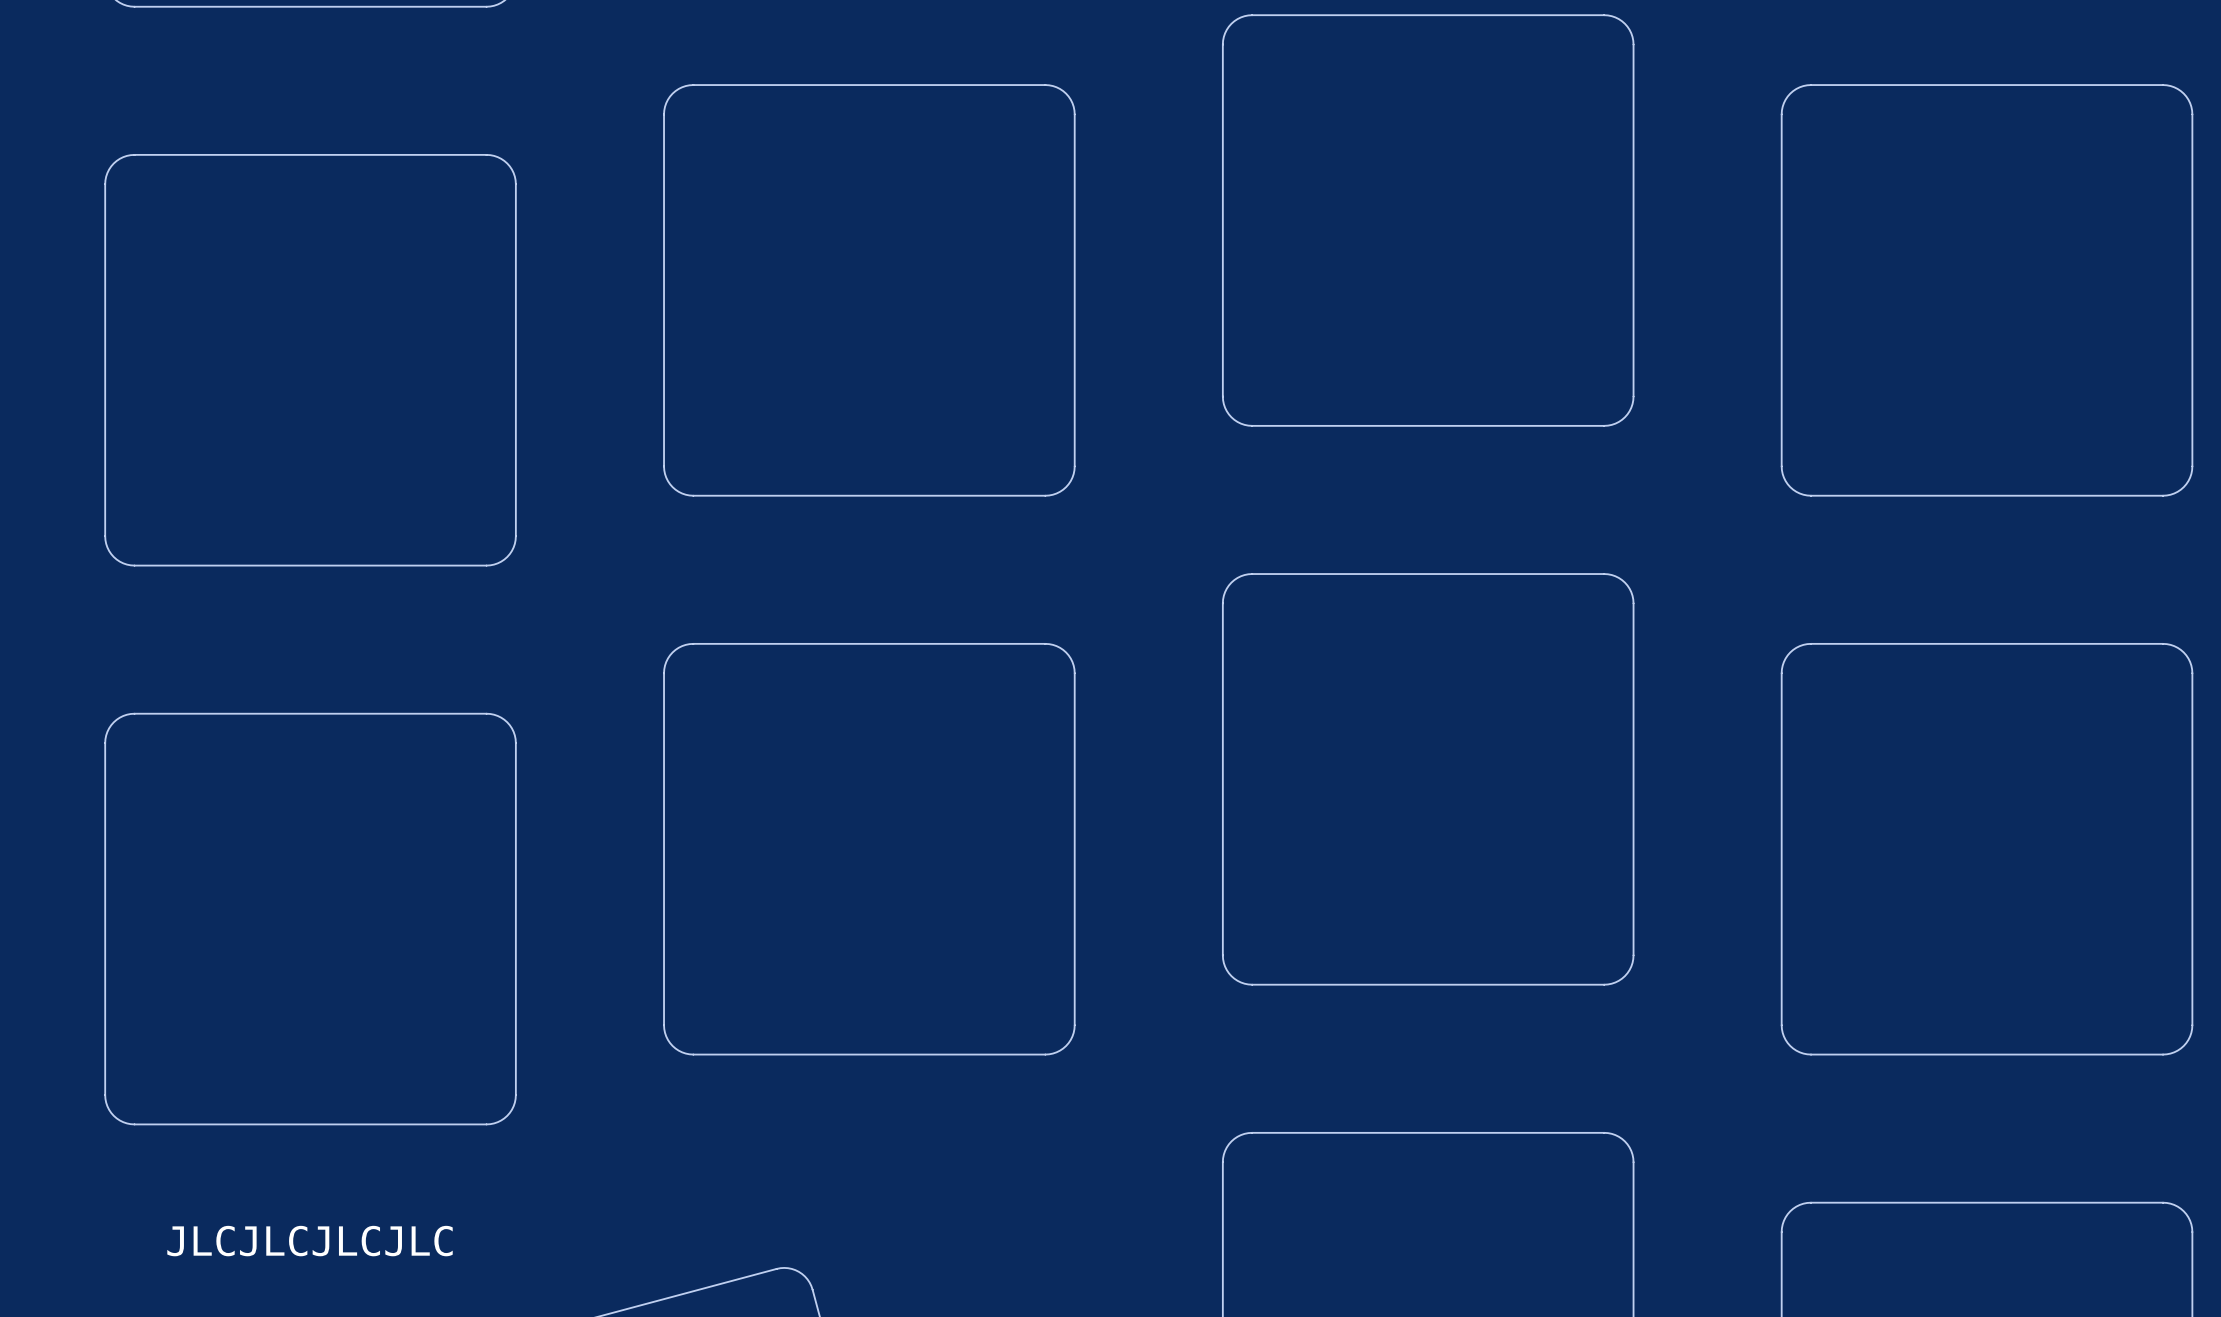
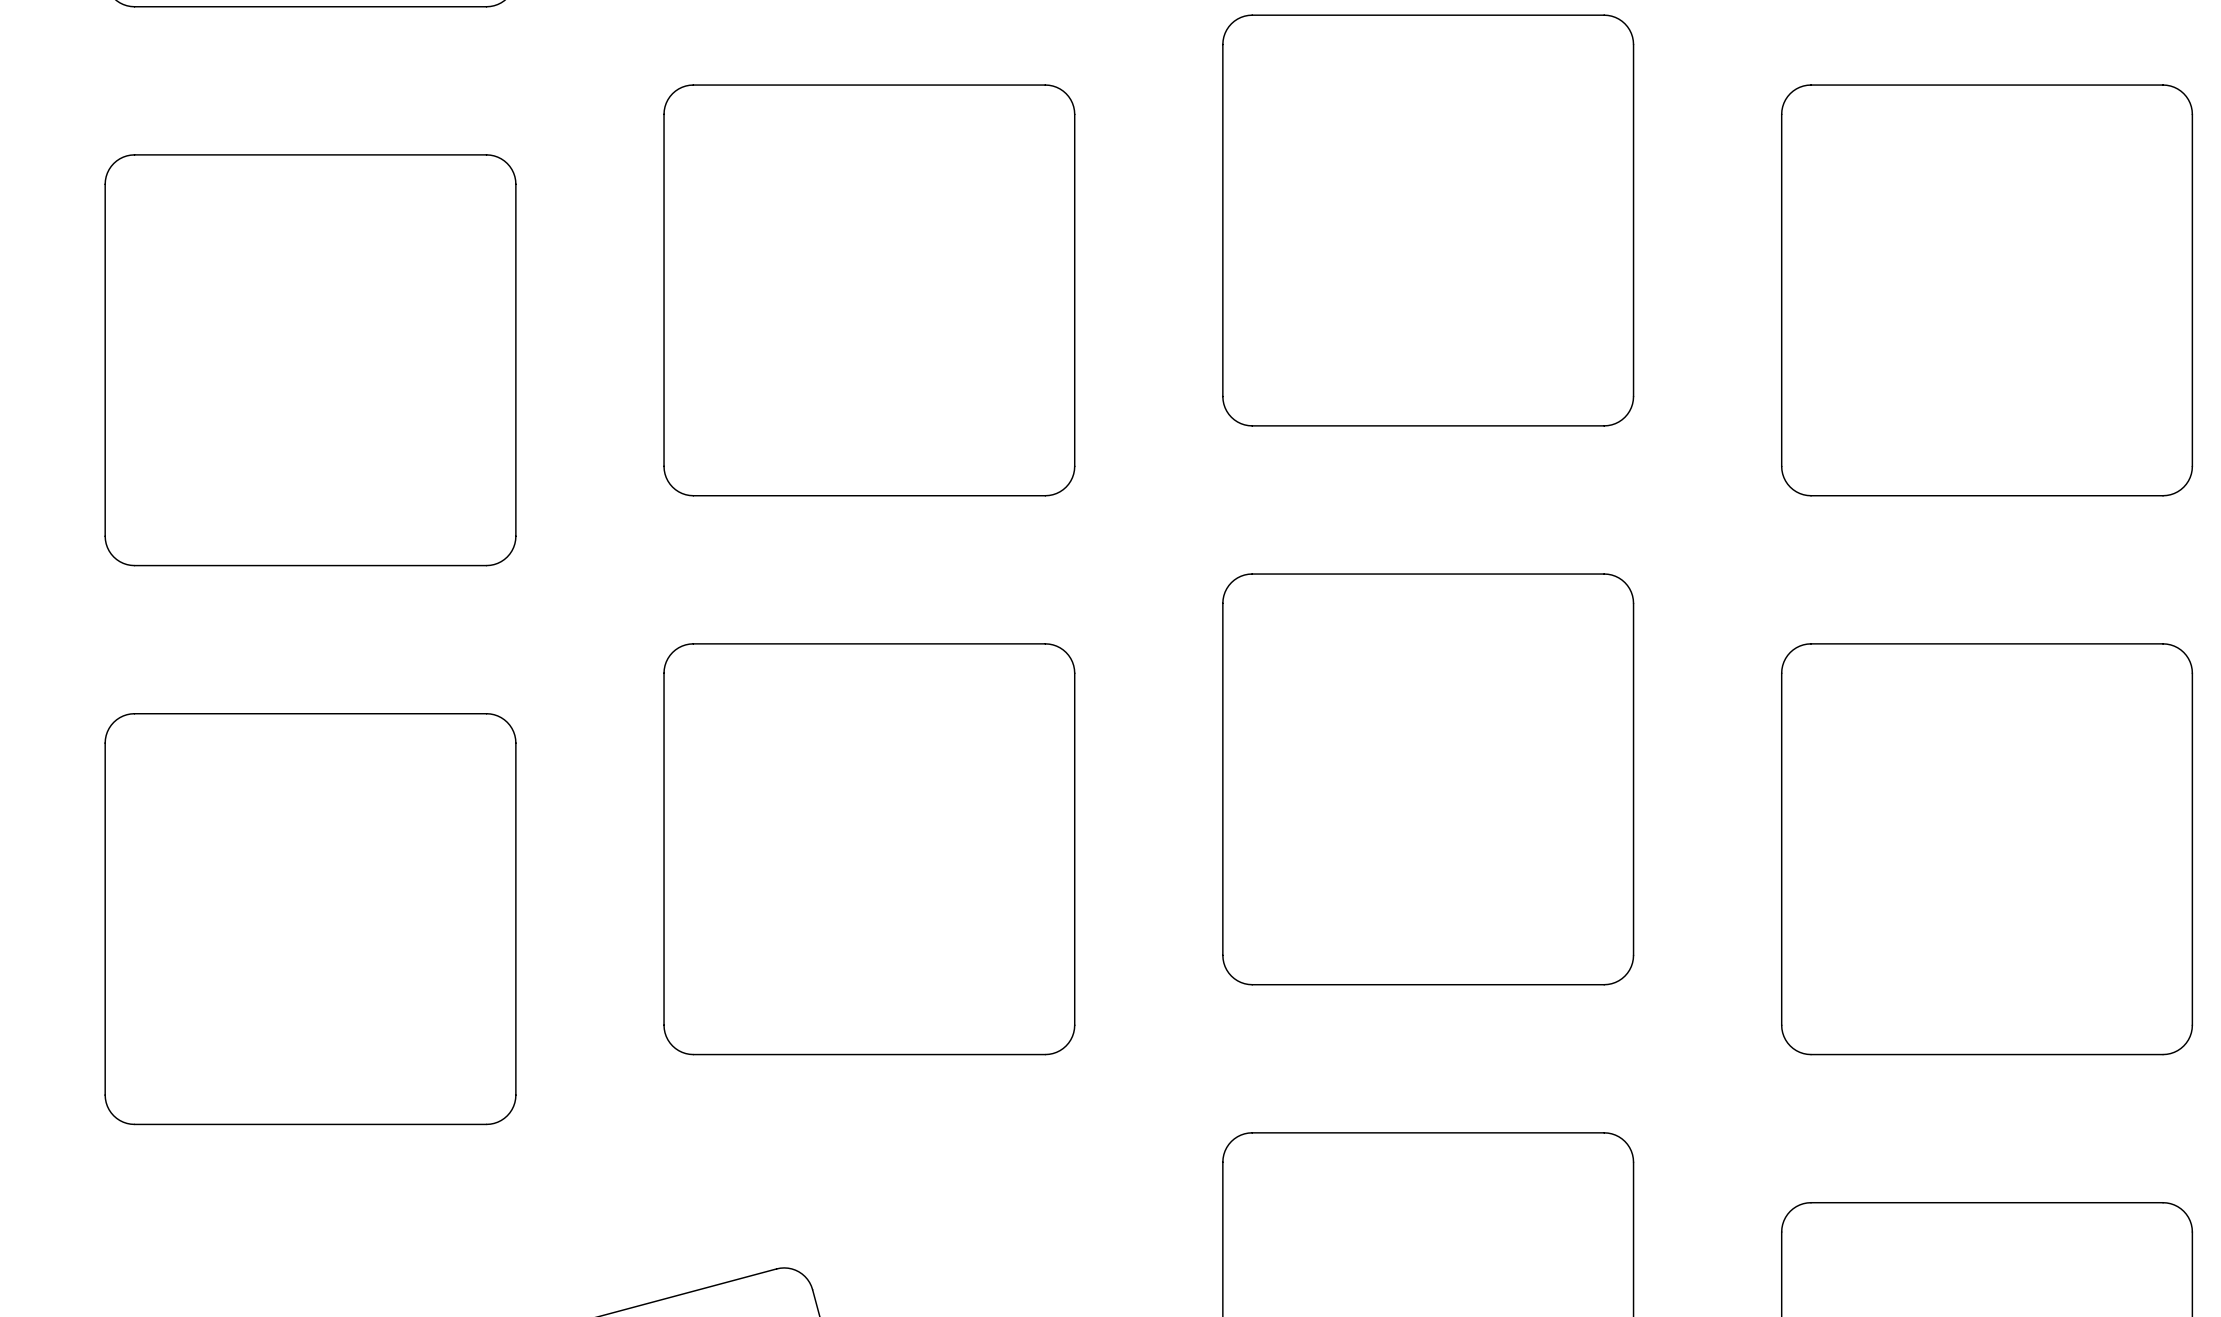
text: JLCJLCJLCJLC (310, 1241) -> none

